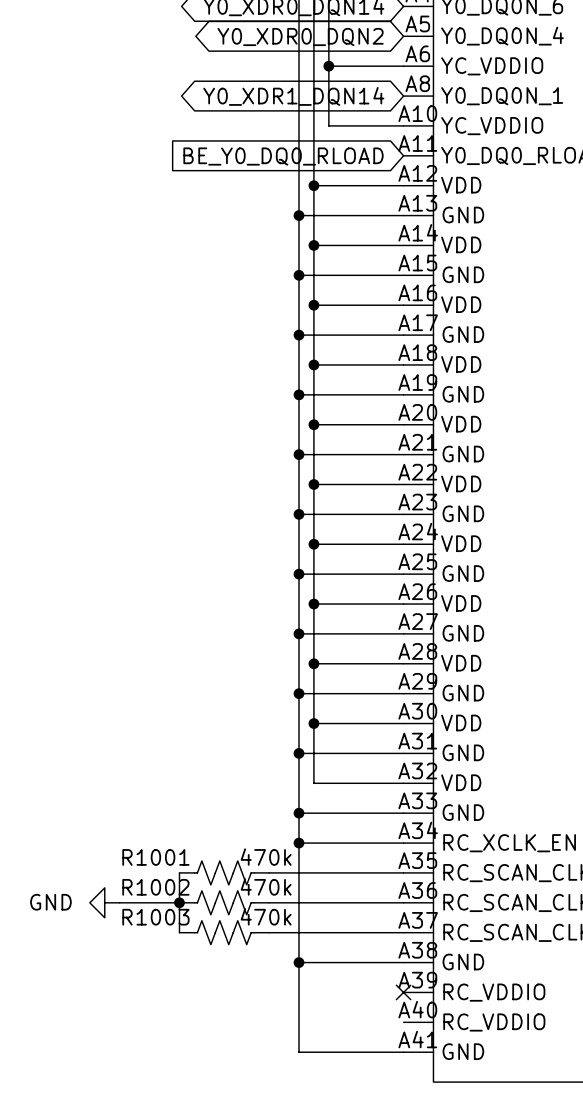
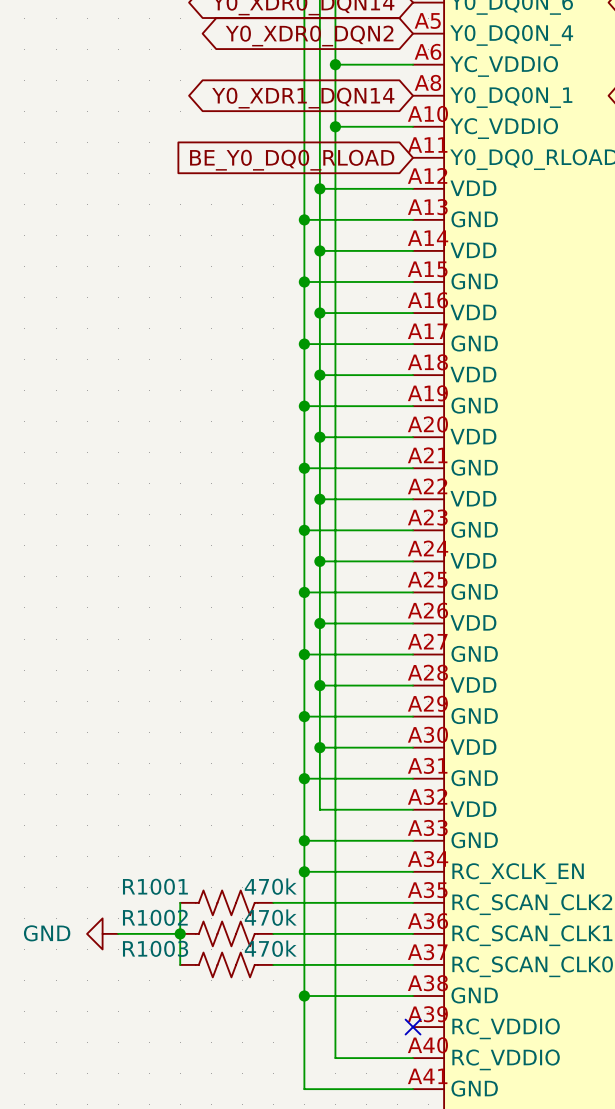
wire: none -> (335, 126) (335, 1058) (413, 1058)
junction: none -> (335, 126)

